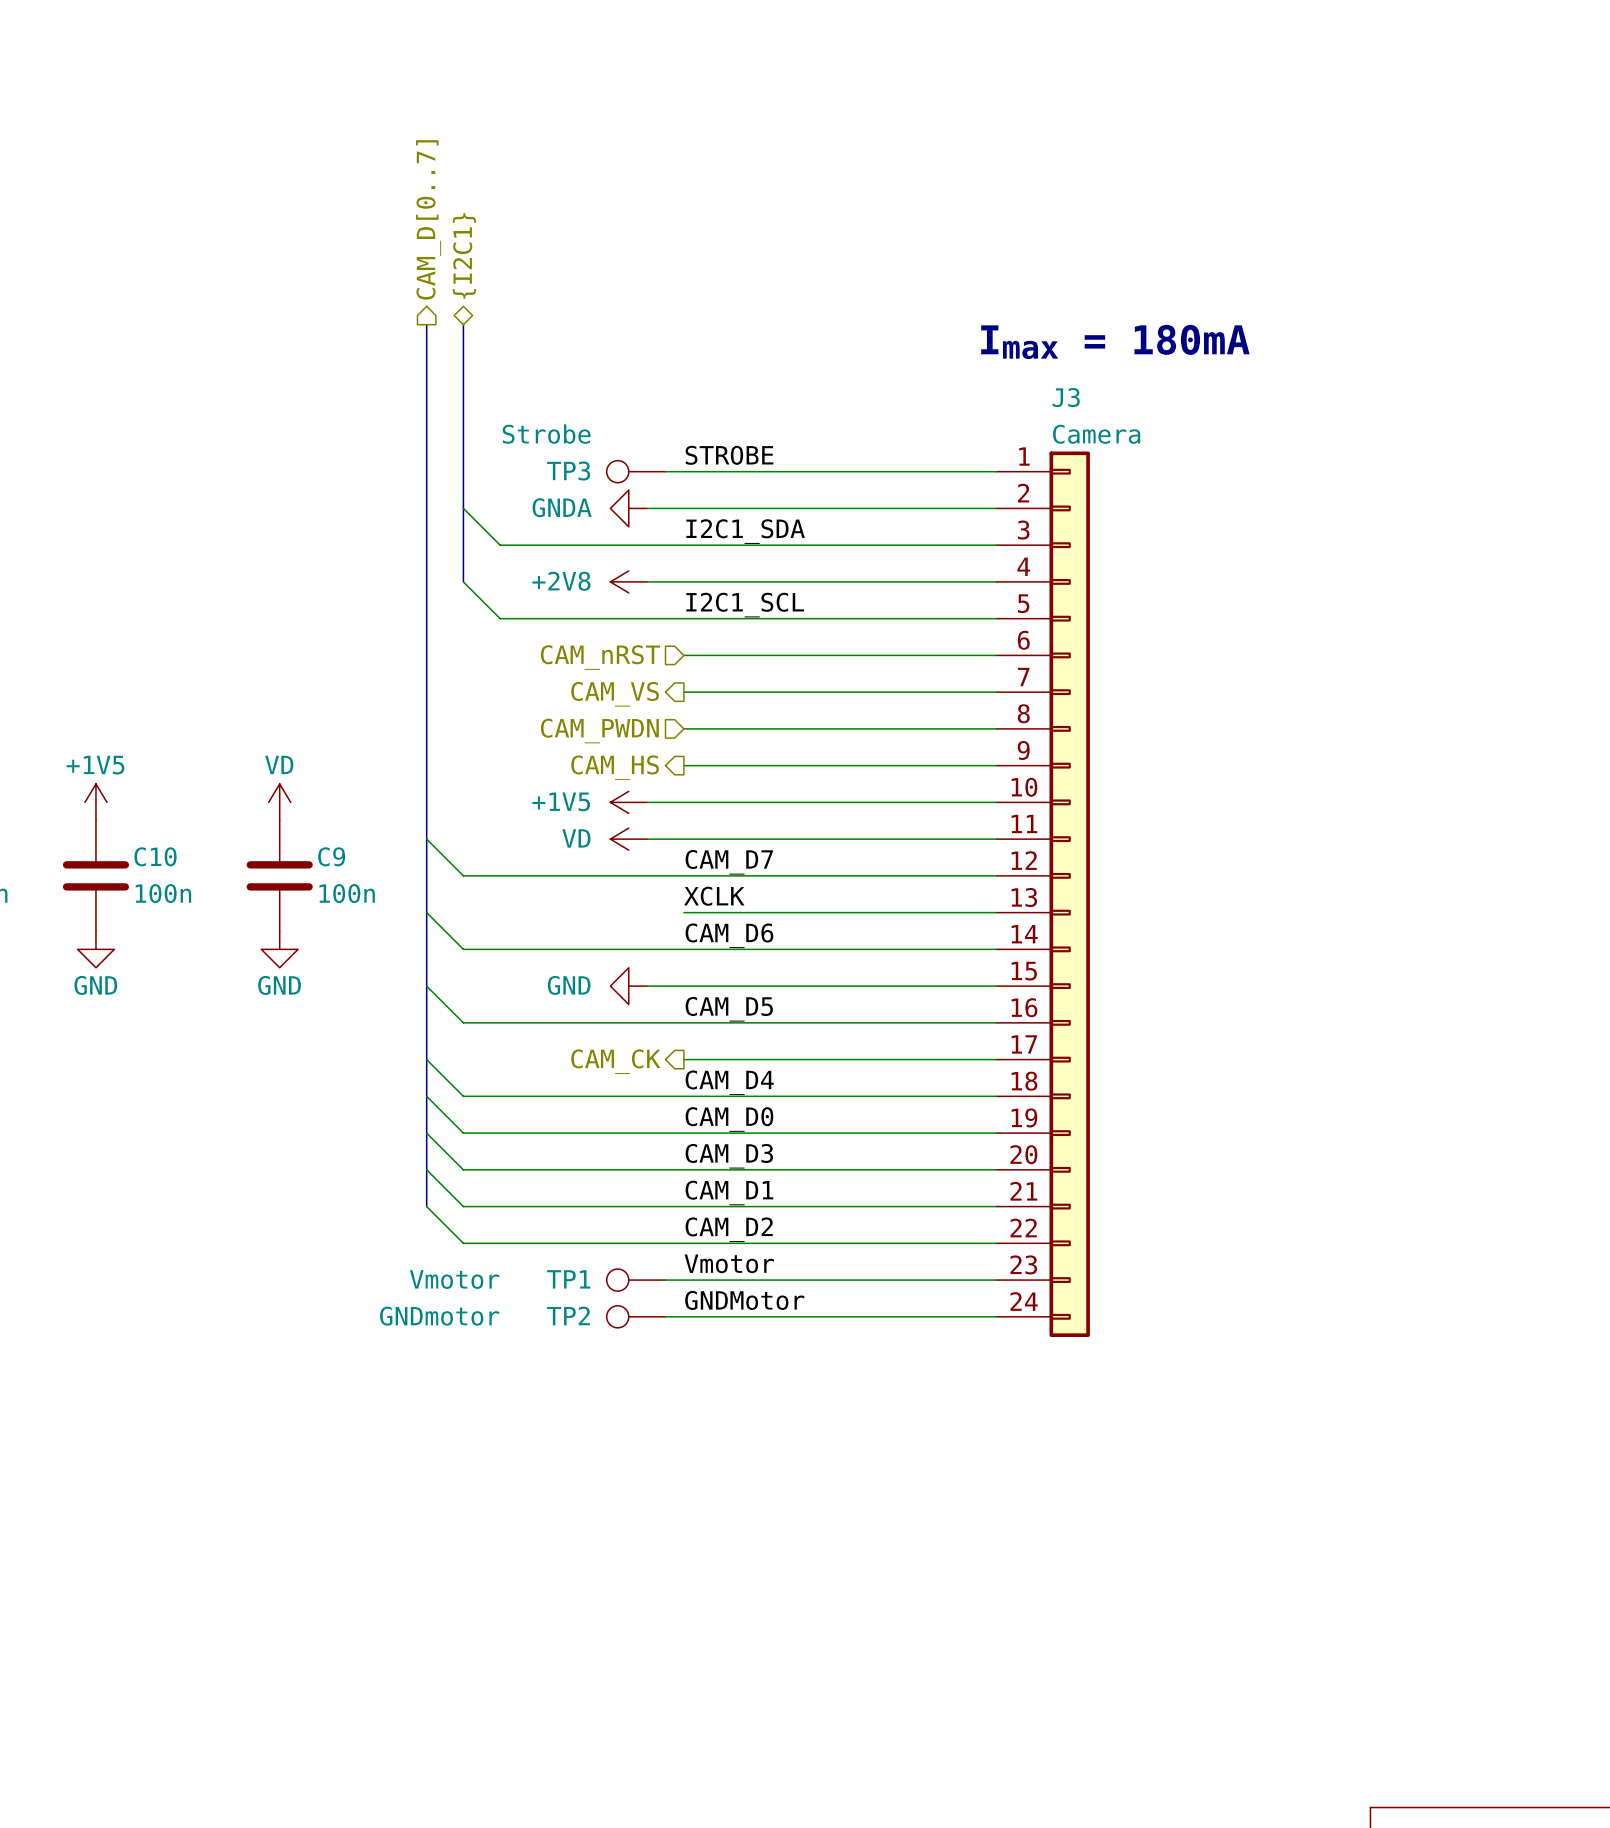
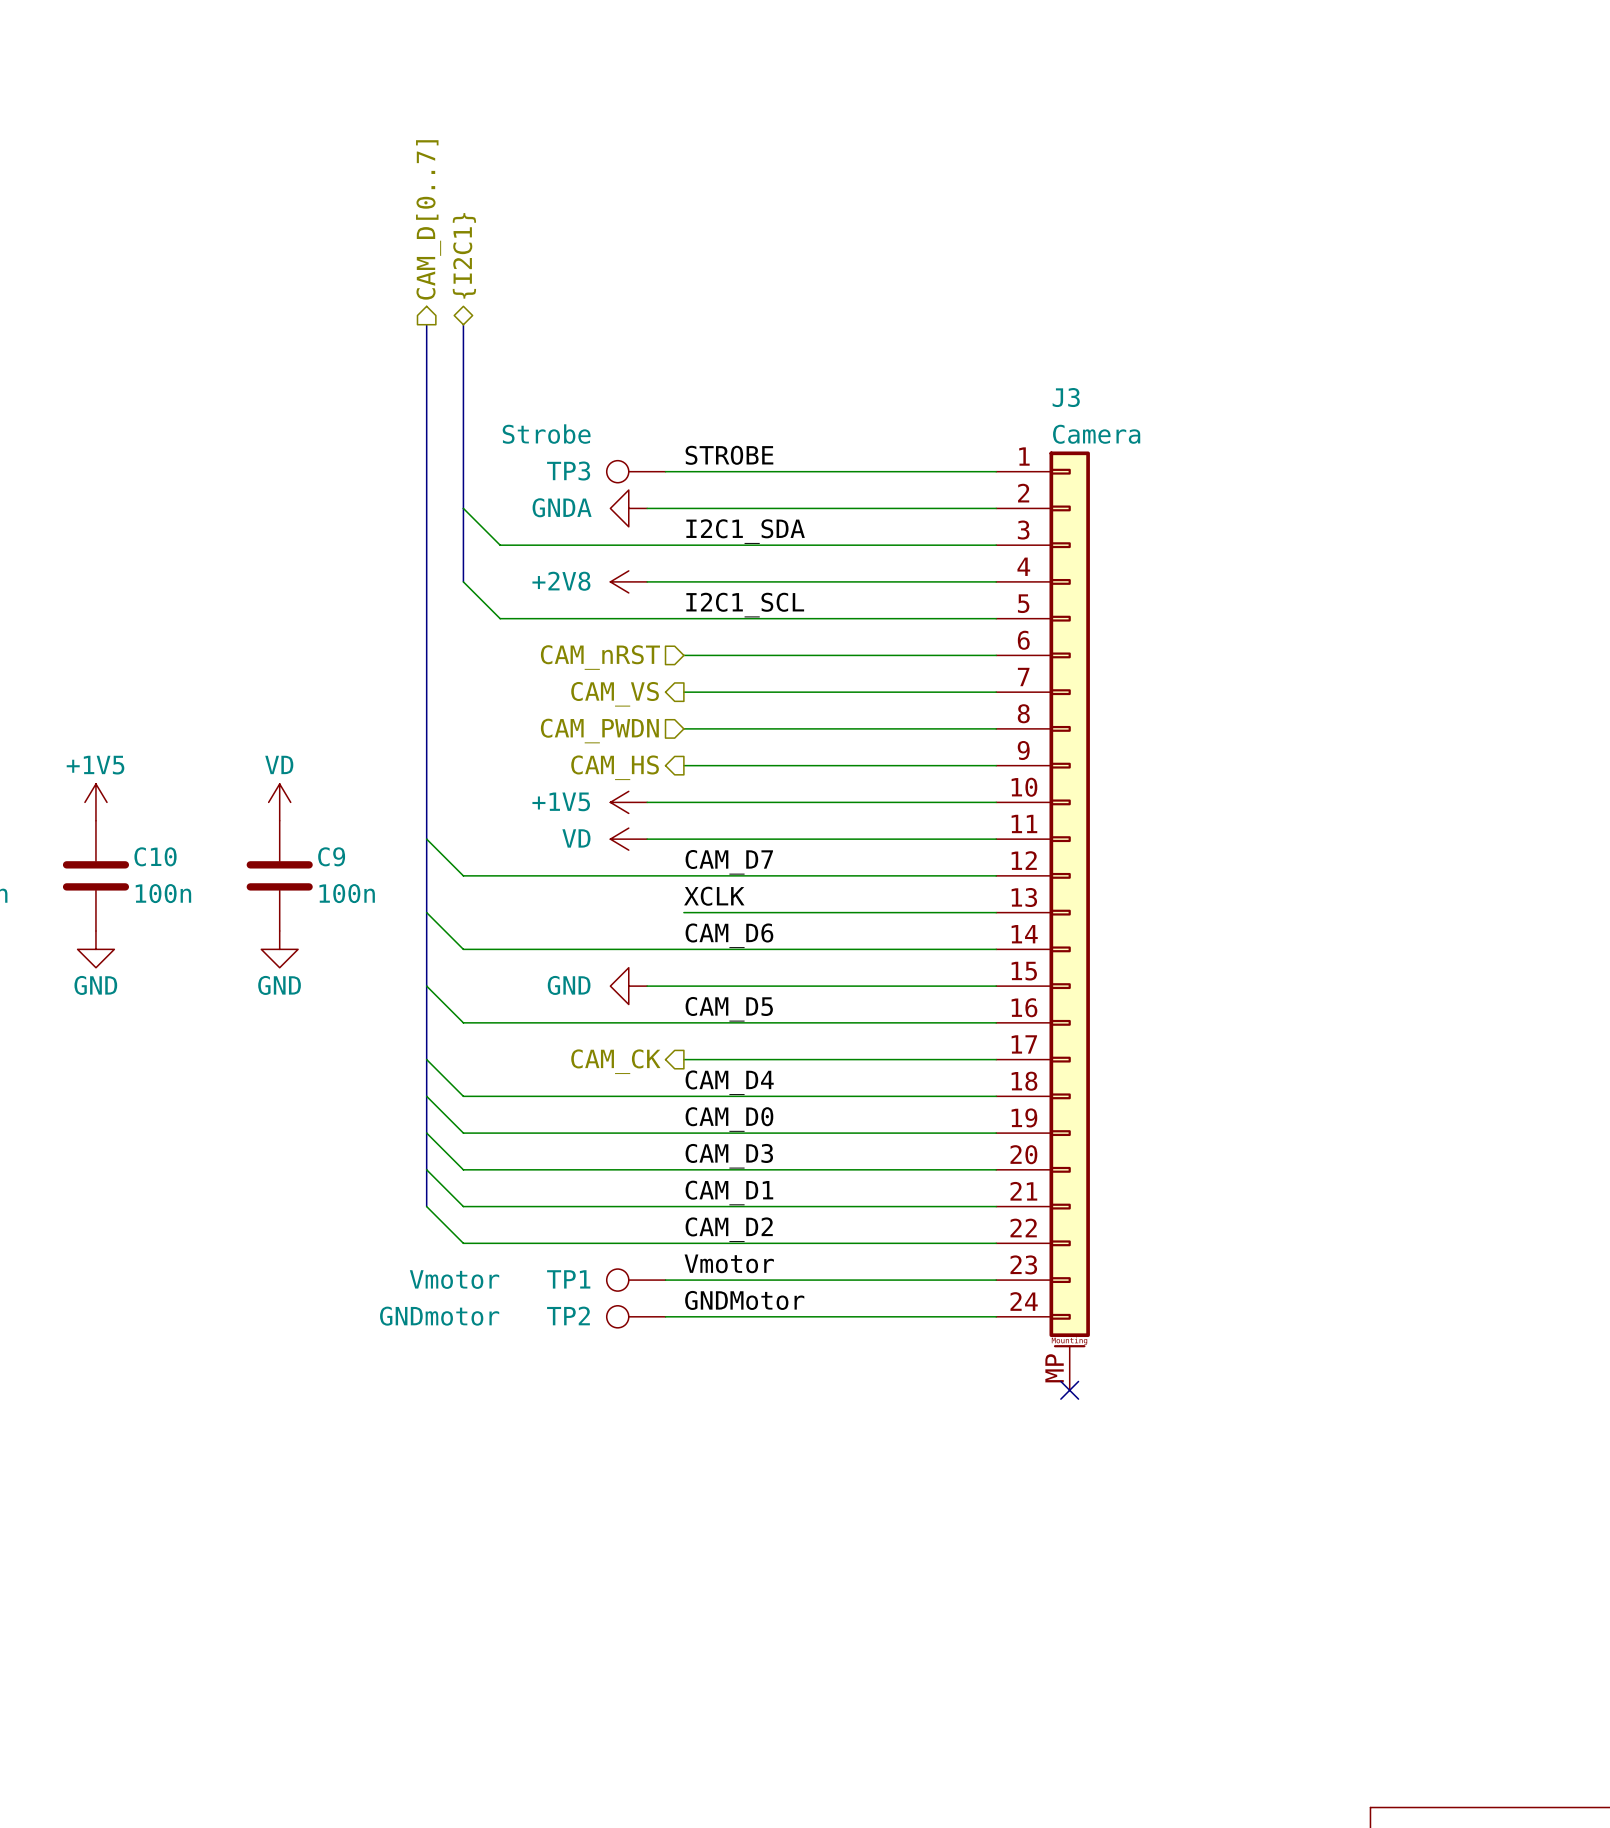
text: Imax = 180mA (1115, 341) -> none
J3 symbol: [996, 451, 1090, 1338] -> [996, 451, 1090, 1391]
no-connect mark: none -> (1069, 1390)

